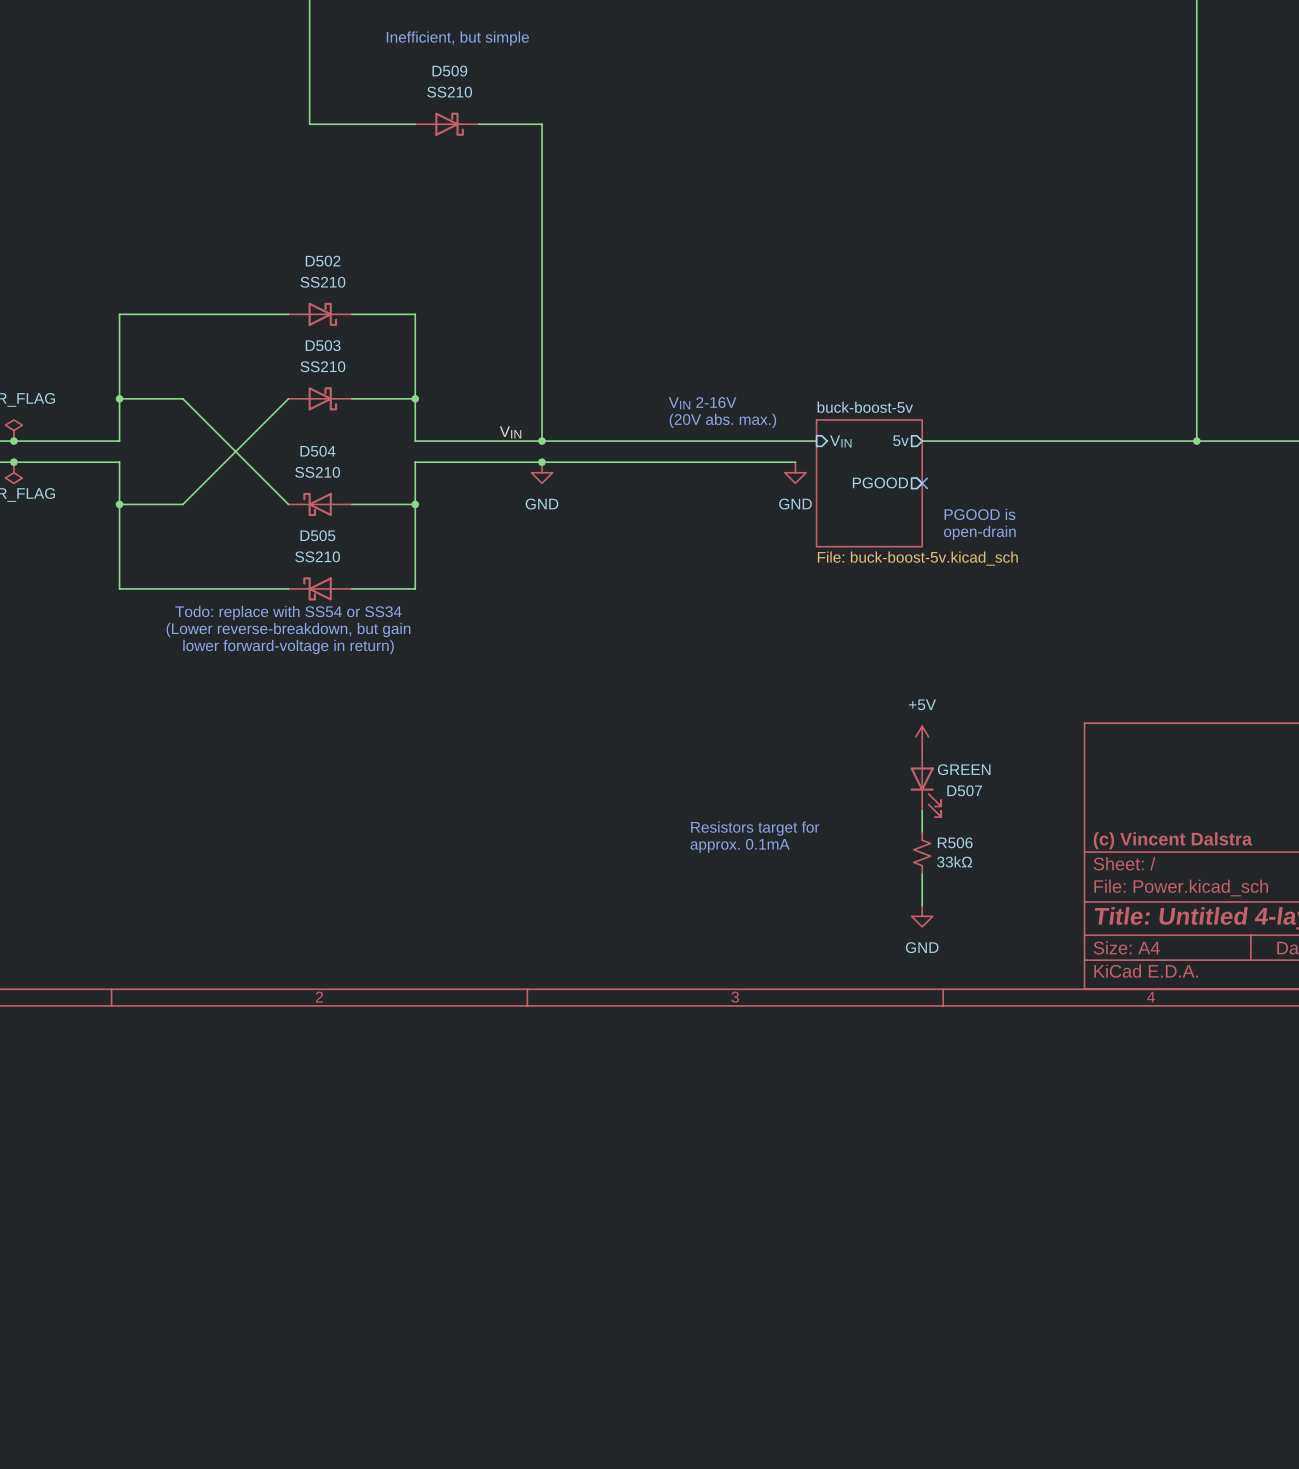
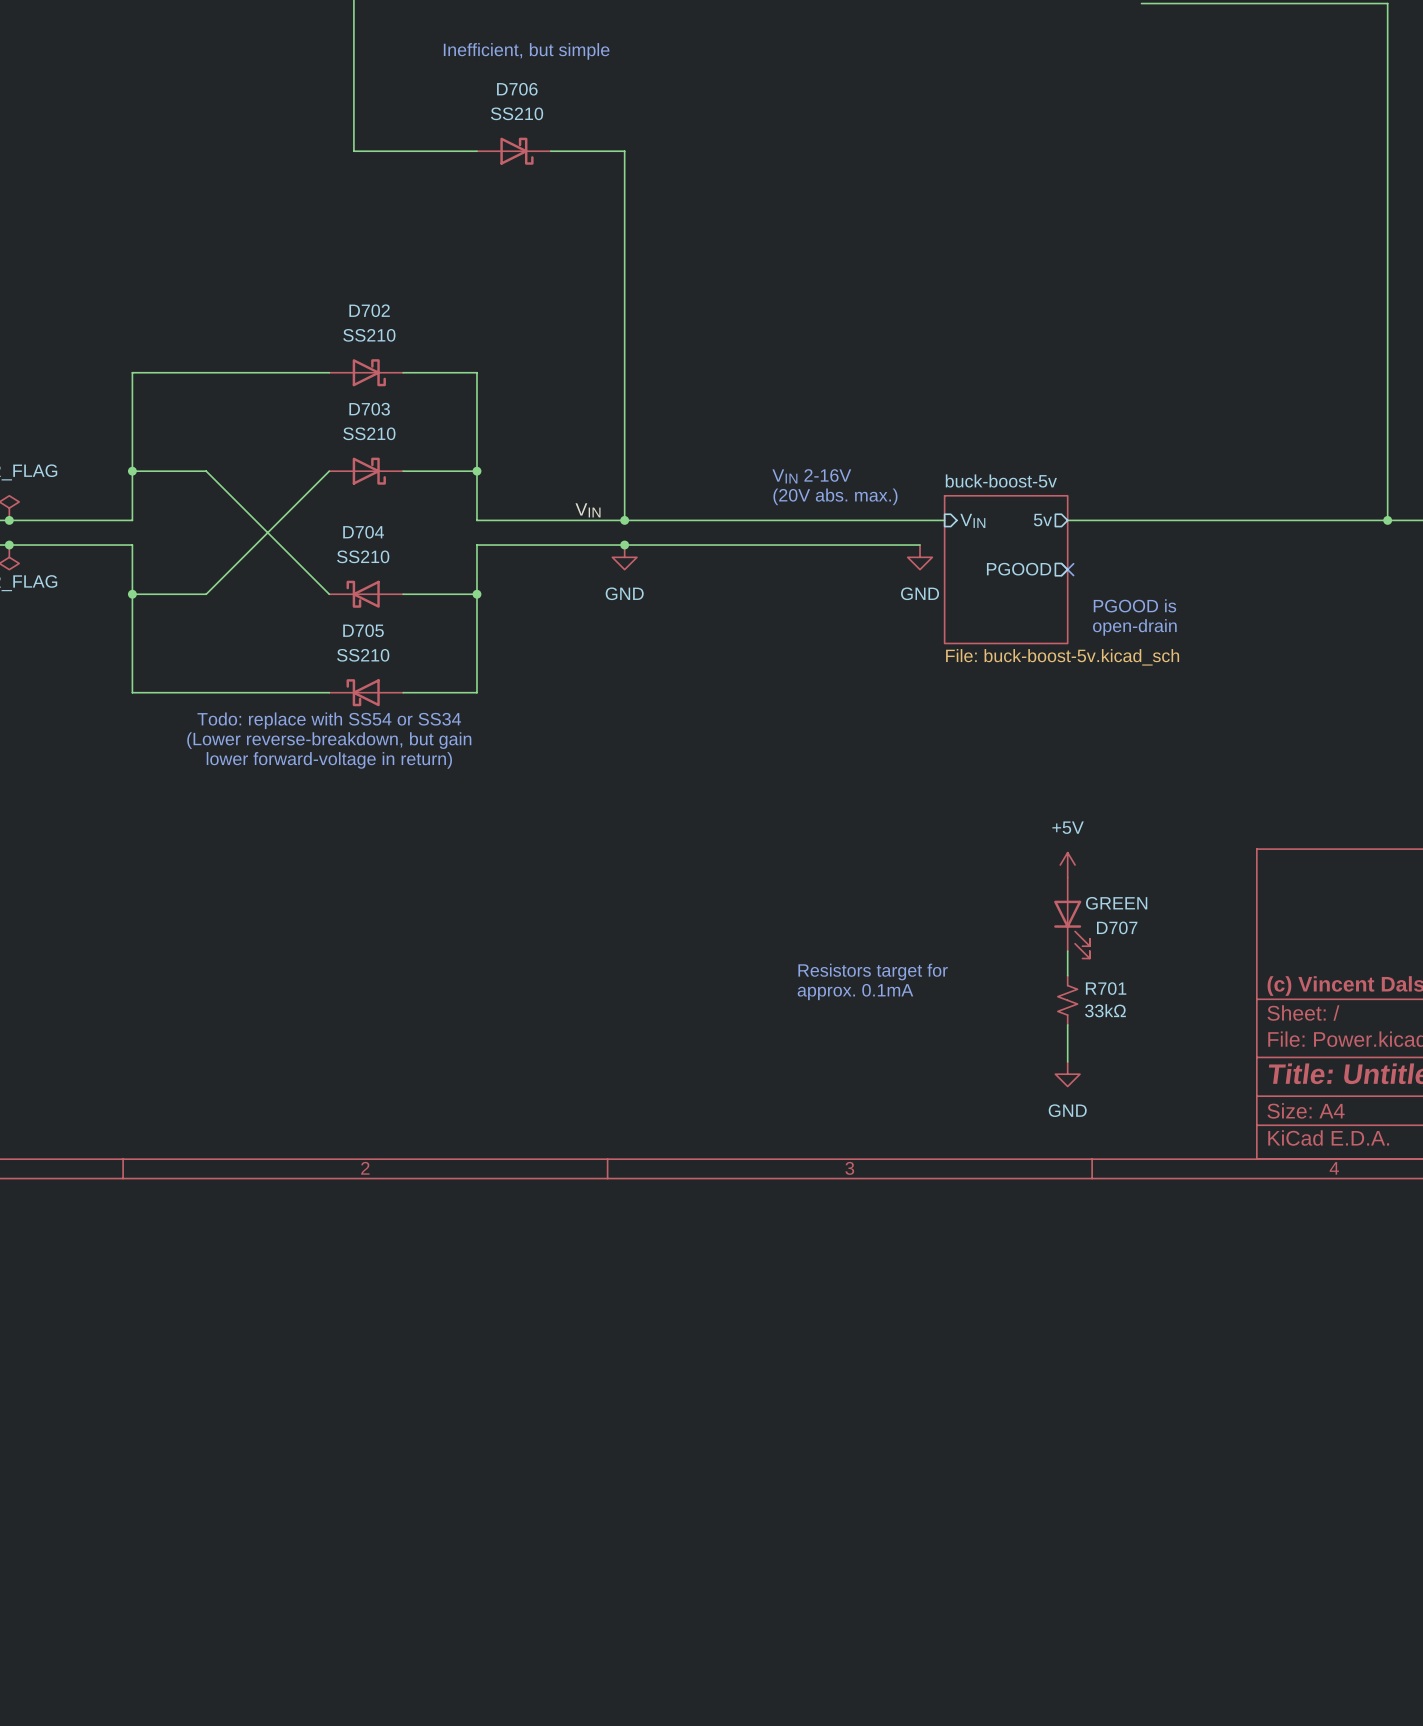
D509 name: D509 (449, 71) -> D706 (517, 89)
D502 name: D502 (323, 261) -> D702 (369, 310)
D503 name: D503 (323, 345) -> D703 (369, 409)
D504 name: D504 (317, 451) -> D704 (363, 532)
D505 name: D505 (317, 535) -> D705 (363, 630)
D507 name: D507 (964, 790) -> D707 (1117, 927)
R506 name: R506 (955, 842) -> R701 (1106, 988)

